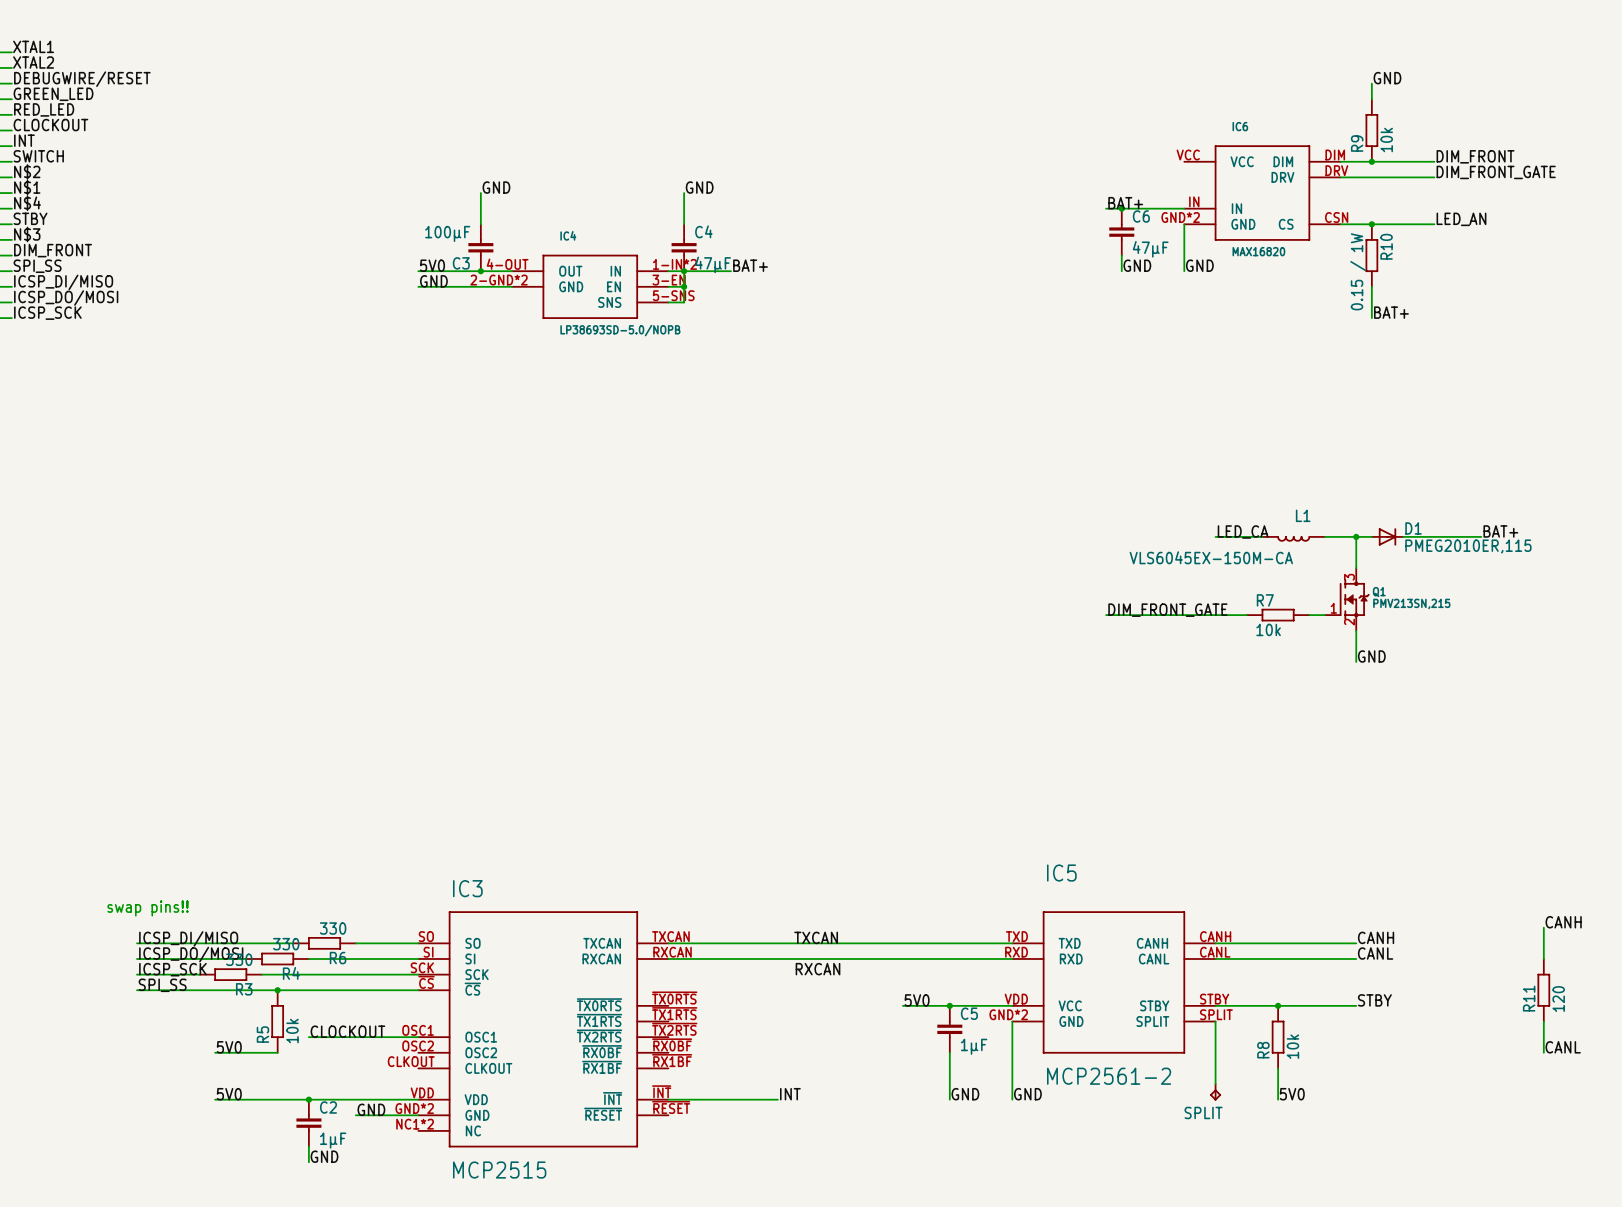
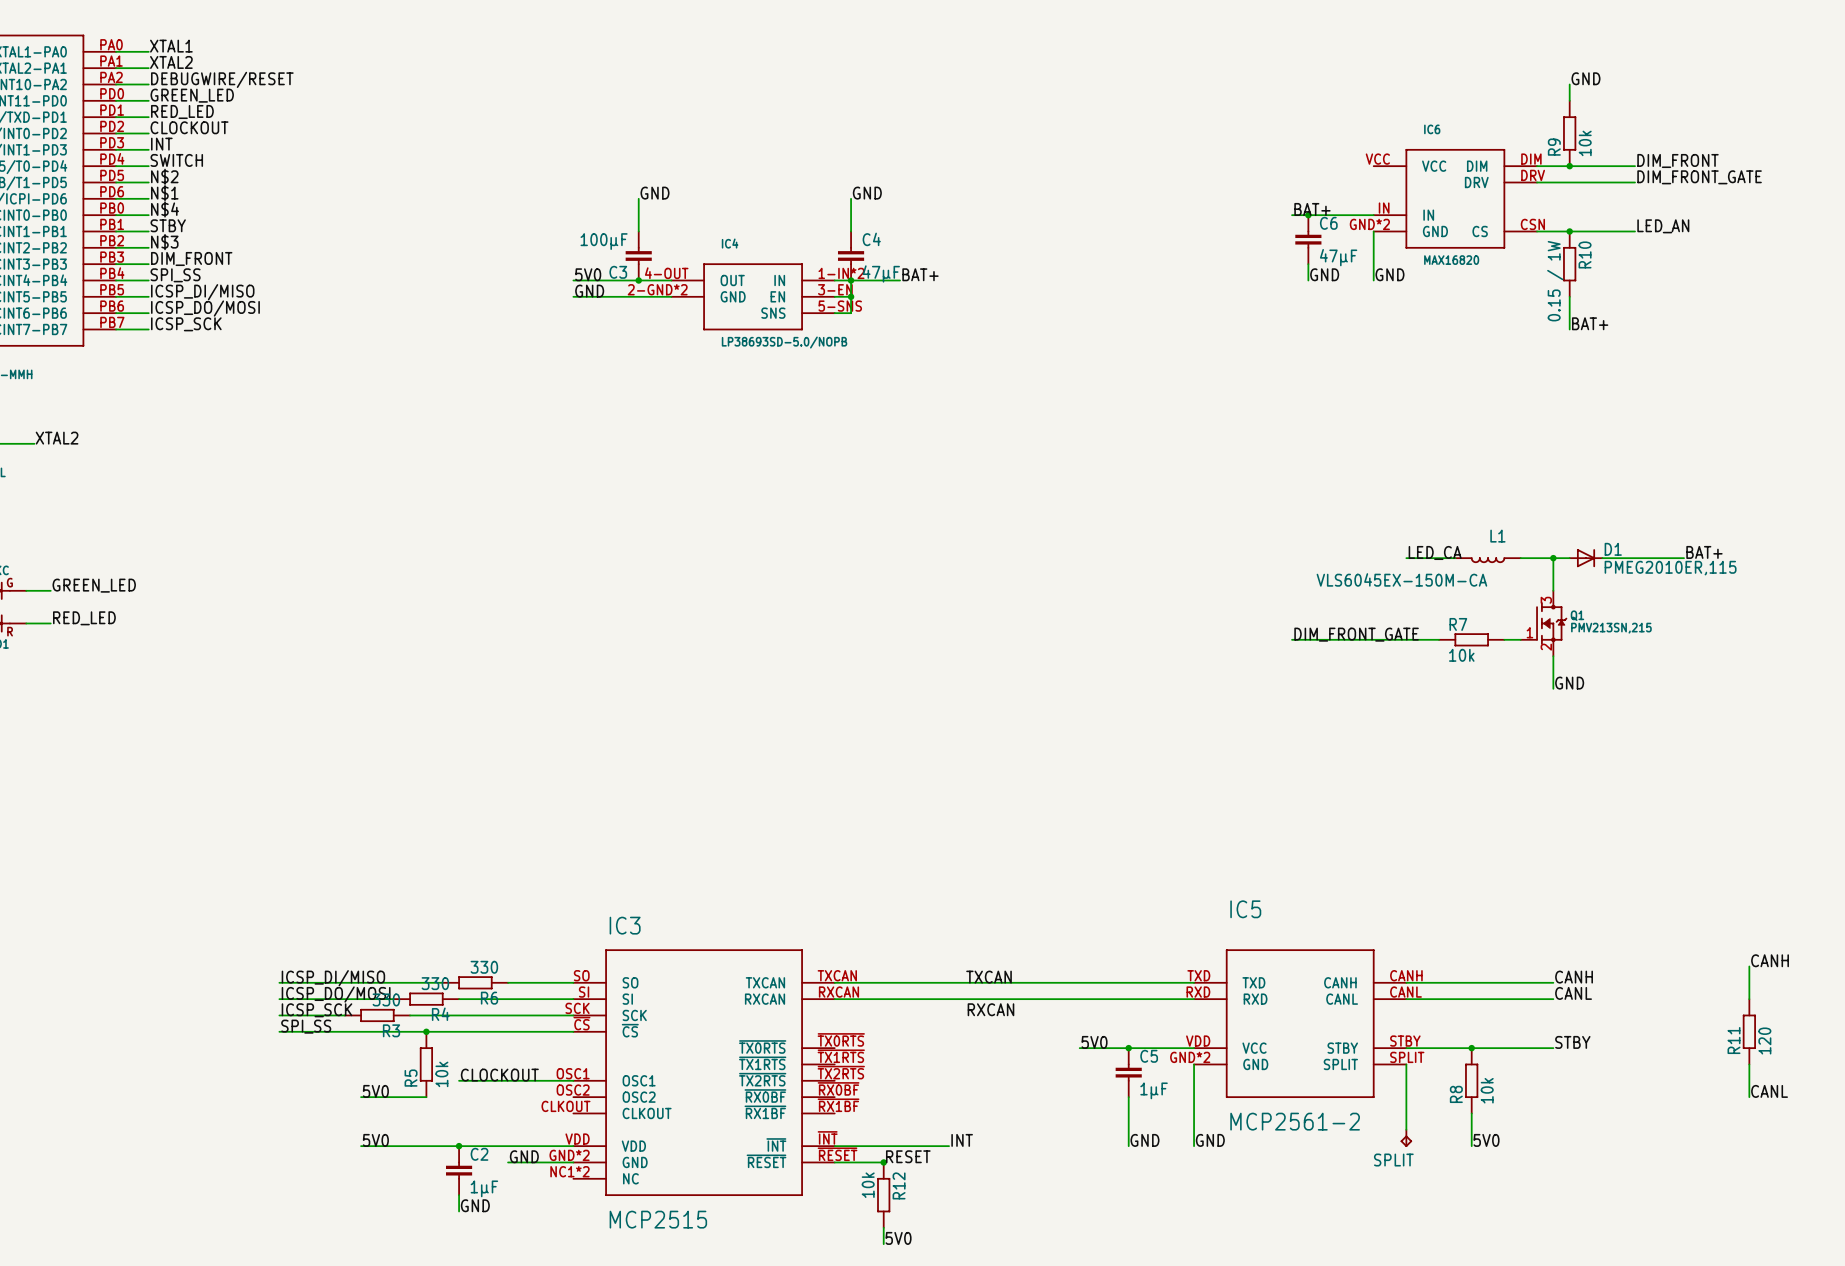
text: swap pins!! (148, 908) -> none
label: none -> RESET (908, 1156)
wire: none -> (834, 1162) (883, 1162)
junction: none -> (883, 1162)
R12: none -> 10k (883, 1195)
wire: none -> (883, 1227) (883, 1244)
label: none -> 5V0 (898, 1238)

